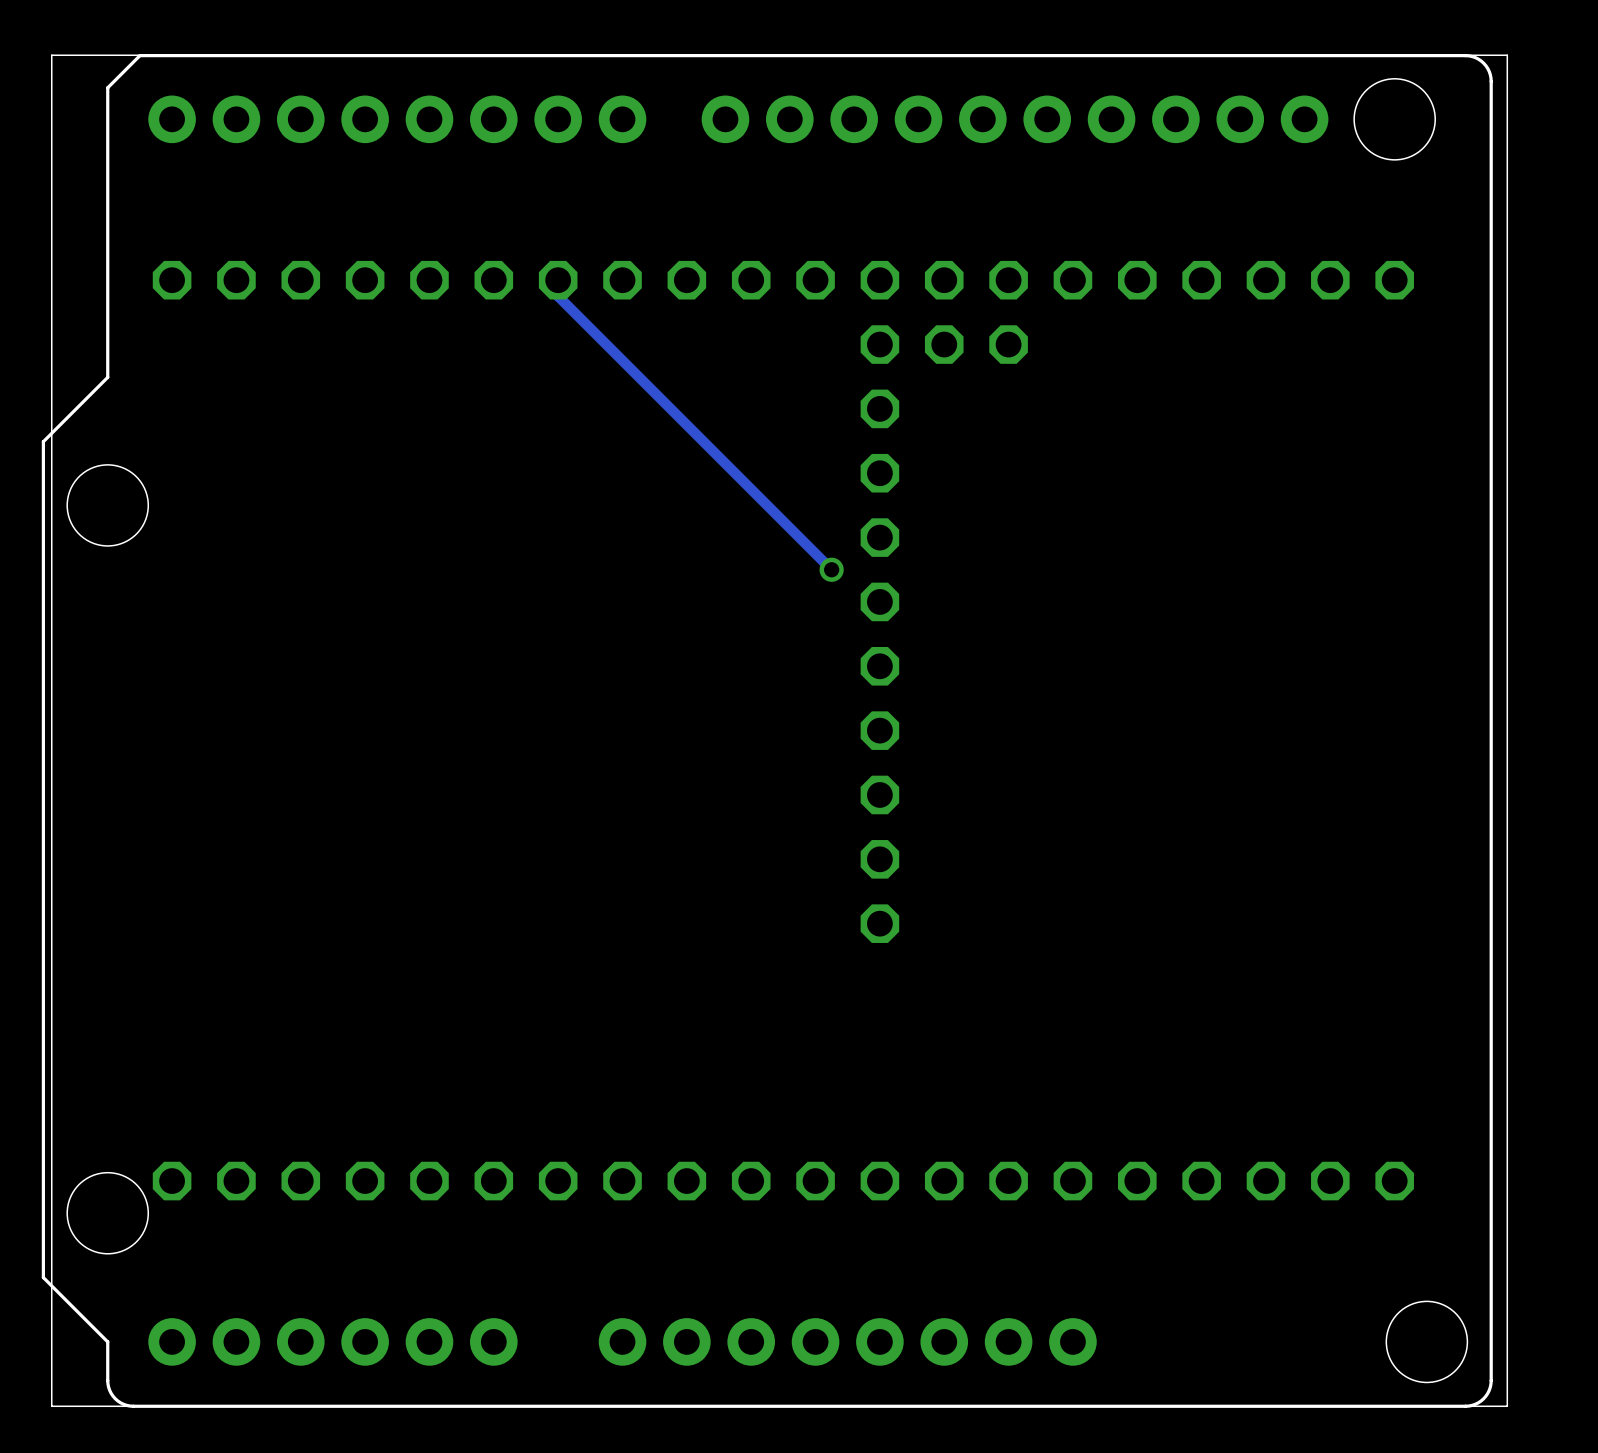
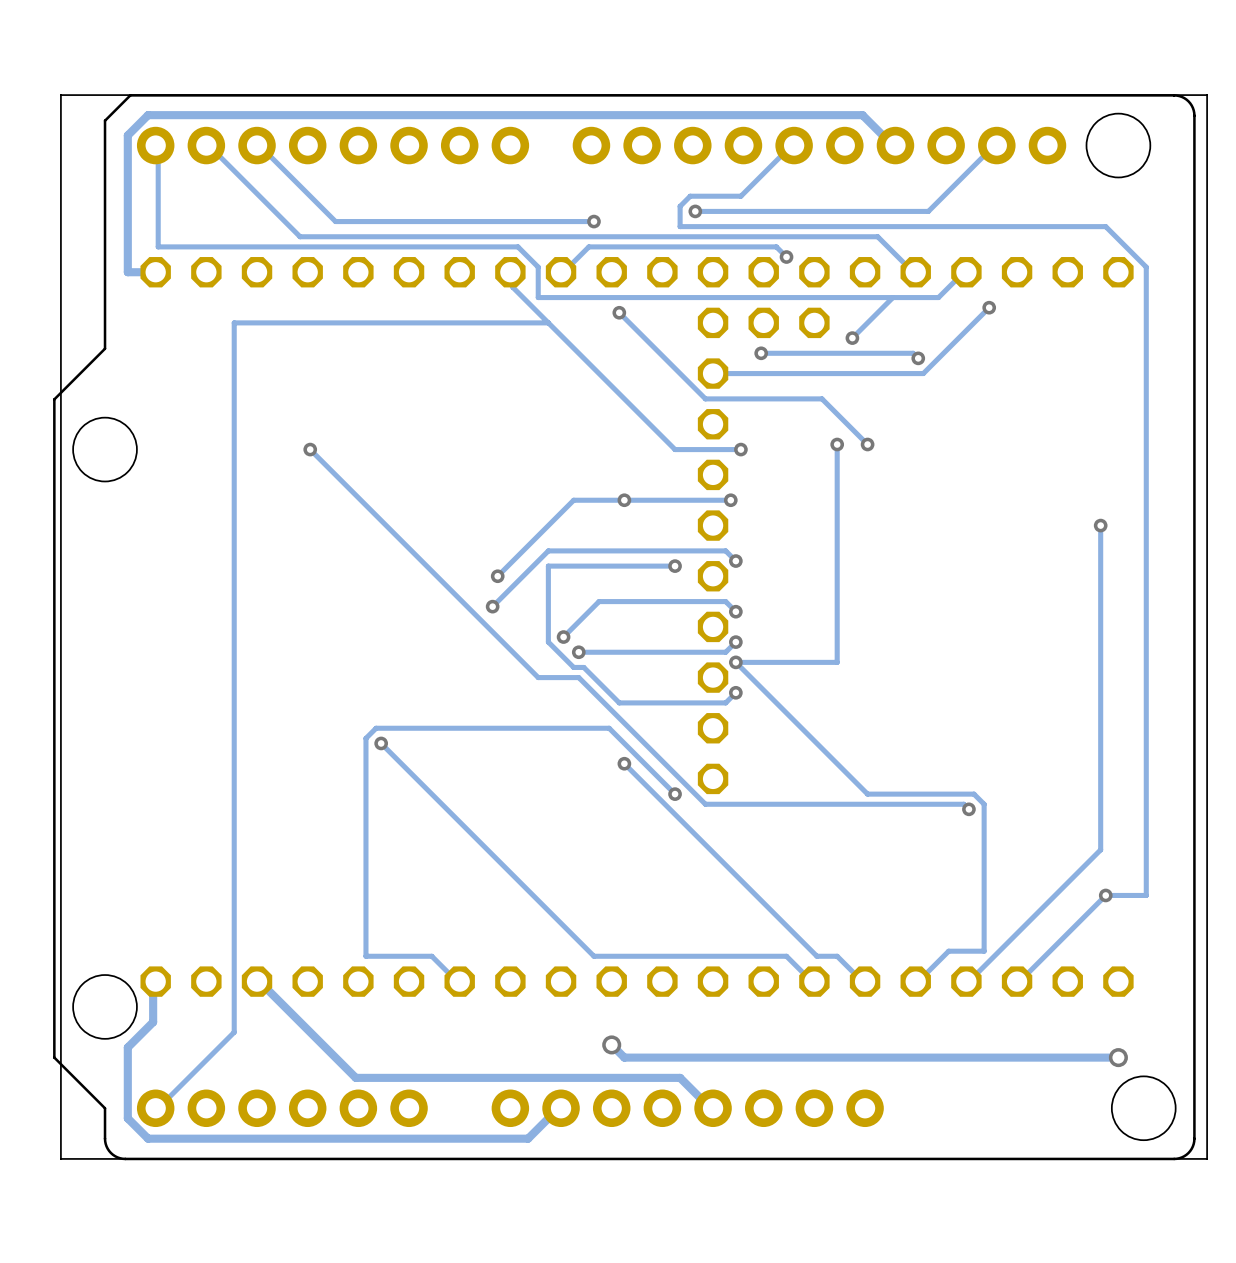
track: none -> (155, 145) (158, 145) (158, 246) (517, 246) (538, 267) (538, 297) (938, 297) (963, 272) (966, 272)
track: none -> (206, 145) (208, 145) (300, 236) (877, 236) (913, 272) (915, 272)
track: none -> (257, 145) (259, 145) (335, 221) (593, 221)
track: none -> (794, 145) (791, 145) (740, 196) (690, 196) (680, 206) (680, 226) (1105, 226) (1146, 267) (1146, 895) (1105, 895) (1019, 981) (1017, 981)
track: none -> (895, 145) (892, 145) (862, 115) (148, 115) (127, 135) (127, 272) (155, 272)
track: none -> (996, 145) (994, 145) (928, 211) (695, 211)
via: none -> (695, 211)
via: none -> (593, 221)
track: none -> (786, 257) (776, 246) (588, 246) (563, 272) (561, 272)
via: none -> (786, 257)
track: (558, 280) (558, 296) (831, 569) -> none
track: none -> (510, 272) (512, 272) (512, 287) (675, 449) (740, 449)
track: none -> (892, 297) (852, 338)
track: none -> (989, 307) (923, 373) (713, 373)
via: none -> (989, 307)
track: none -> (619, 312) (705, 398) (821, 398) (867, 444)
via: none -> (619, 312)
track: none -> (548, 322) (234, 322) (234, 1032) (158, 1108) (155, 1108)
via: none -> (852, 338)
track: none -> (761, 353) (913, 353) (918, 358)
via: none -> (761, 353)
via: none -> (918, 358)
track: none -> (837, 444) (837, 662) (735, 662) (867, 794) (974, 794) (984, 804) (984, 951) (948, 951) (918, 981) (915, 981)
via: none -> (837, 444)
via: none -> (867, 444)
track: none -> (310, 449) (538, 677) (578, 677) (705, 804) (963, 804) (968, 809)
via: none -> (310, 449)
via: none -> (740, 449)
via: none -> (624, 500)
via: (831, 569) -> none
track: none -> (730, 500) (573, 500) (497, 576)
via: none -> (730, 500)
track: none -> (1100, 525) (1100, 849) (968, 981) (966, 981)
via: none -> (1100, 525)
track: none -> (735, 561) (725, 550) (548, 550) (492, 606)
via: none -> (735, 561)
track: none -> (675, 566) (548, 566) (548, 642) (573, 667) (583, 667) (619, 702) (725, 702) (735, 692)
via: none -> (675, 566)
via: none -> (497, 576)
via: none -> (492, 606)
track: none -> (735, 611) (725, 601) (599, 601) (563, 637)
via: none -> (735, 611)
via: none -> (563, 637)
track: none -> (735, 642) (725, 652) (578, 652)
via: none -> (735, 642)
via: none -> (578, 652)
via: none -> (735, 662)
via: none -> (735, 692)
track: none -> (381, 743) (593, 956) (786, 956) (811, 981) (814, 981)
via: none -> (381, 743)
track: none -> (624, 763) (816, 956) (837, 956) (862, 981) (865, 981)
via: none -> (624, 763)
track: none -> (675, 794) (609, 728) (376, 728) (365, 738) (365, 956) (431, 956) (457, 981) (459, 981)
via: none -> (675, 794)
via: none -> (968, 809)
via: none -> (1105, 895)
track: none -> (155, 981) (153, 981) (153, 1022) (127, 1047) (127, 1118) (148, 1138) (528, 1138) (558, 1108) (561, 1108)
track: none -> (257, 981) (259, 981) (355, 1077) (680, 1077) (710, 1108) (713, 1108)
track: none -> (611, 1044) (624, 1057) (1118, 1057)
via: none -> (611, 1044)
via: none -> (1118, 1057)

